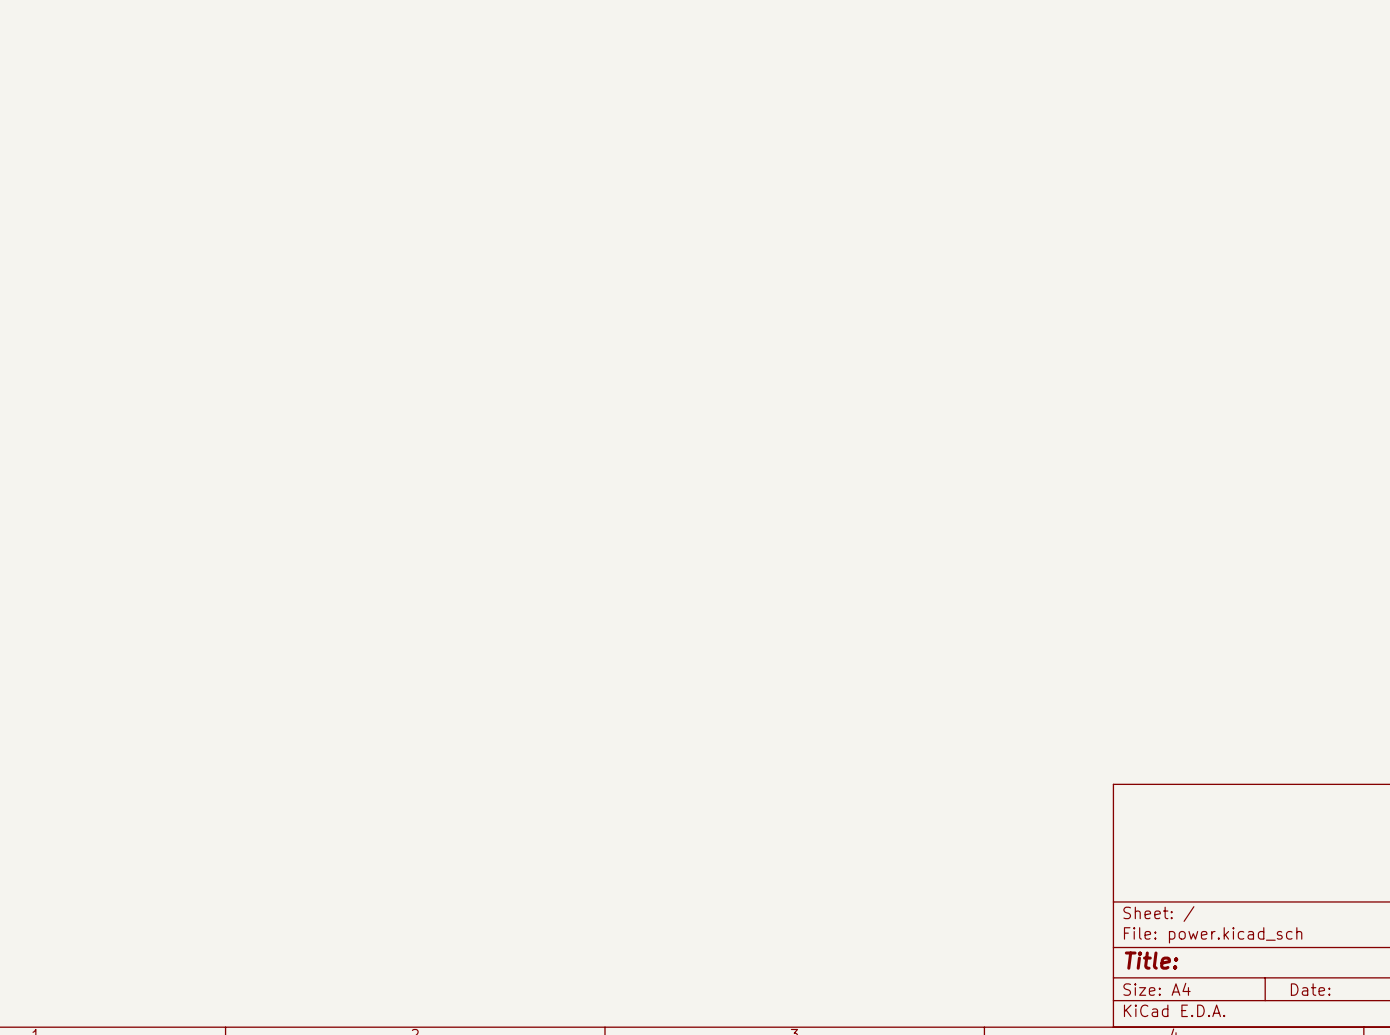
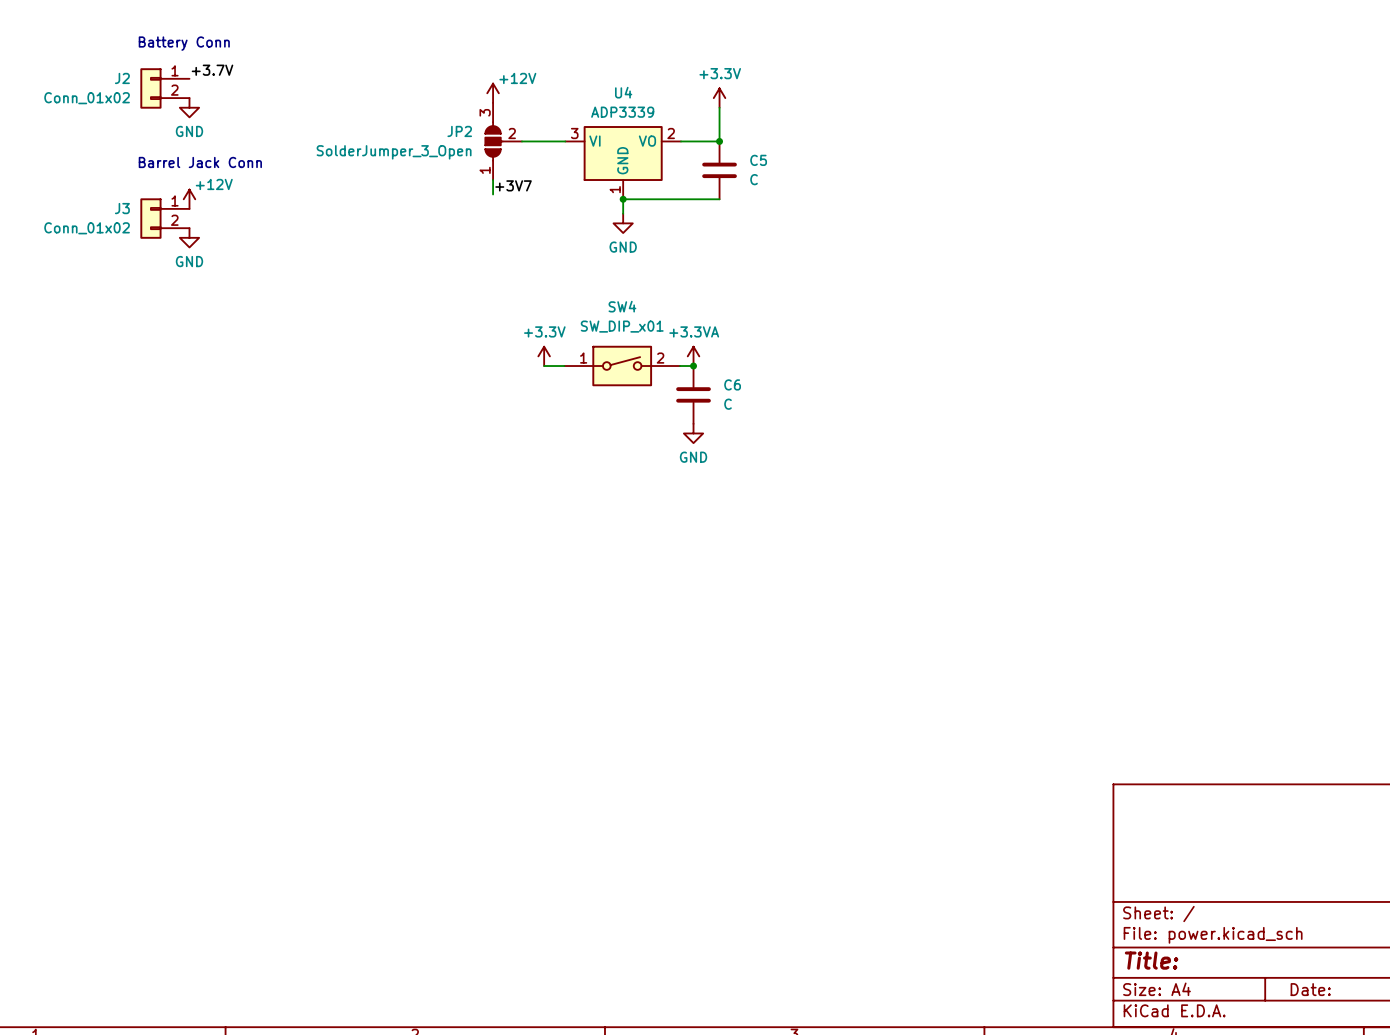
text: none -> Battery Conn (184, 43)
label: none -> +3.7V (212, 70)
J2: none -> Conn_01x02 (164, 88)
power symbol: none -> +12V (493, 93)
power symbol: none -> +3.3V (719, 98)
power symbol: none -> GND (189, 107)
wire: none -> (719, 107) (719, 141) (680, 141)
JP2: none -> SolderJumper_3_Open (503, 141)
wire: none -> (521, 141) (565, 141)
junction: none -> (719, 141)
text: none -> Barrel Jack Conn (200, 162)
U4: none -> ADP3339 (623, 162)
C5: none -> C (719, 170)
wire: none -> (493, 180) (493, 194)
label: none -> +3V7 (513, 185)
power symbol: none -> +12V (189, 199)
junction: none -> (623, 199)
wire: none -> (719, 199) (623, 199) (623, 213)
J3: none -> Conn_01x02 (164, 218)
power symbol: none -> GND (623, 223)
power symbol: none -> GND (189, 237)
power symbol: none -> +3.3V (544, 356)
power symbol: none -> +3.3VA (693, 356)
wire: none -> (544, 366) (564, 366)
SW4: none -> SW_DIP_x01 (622, 366)
wire: none -> (680, 366) (693, 366)
junction: none -> (693, 366)
C6: none -> C (693, 394)
power symbol: none -> GND (693, 433)

